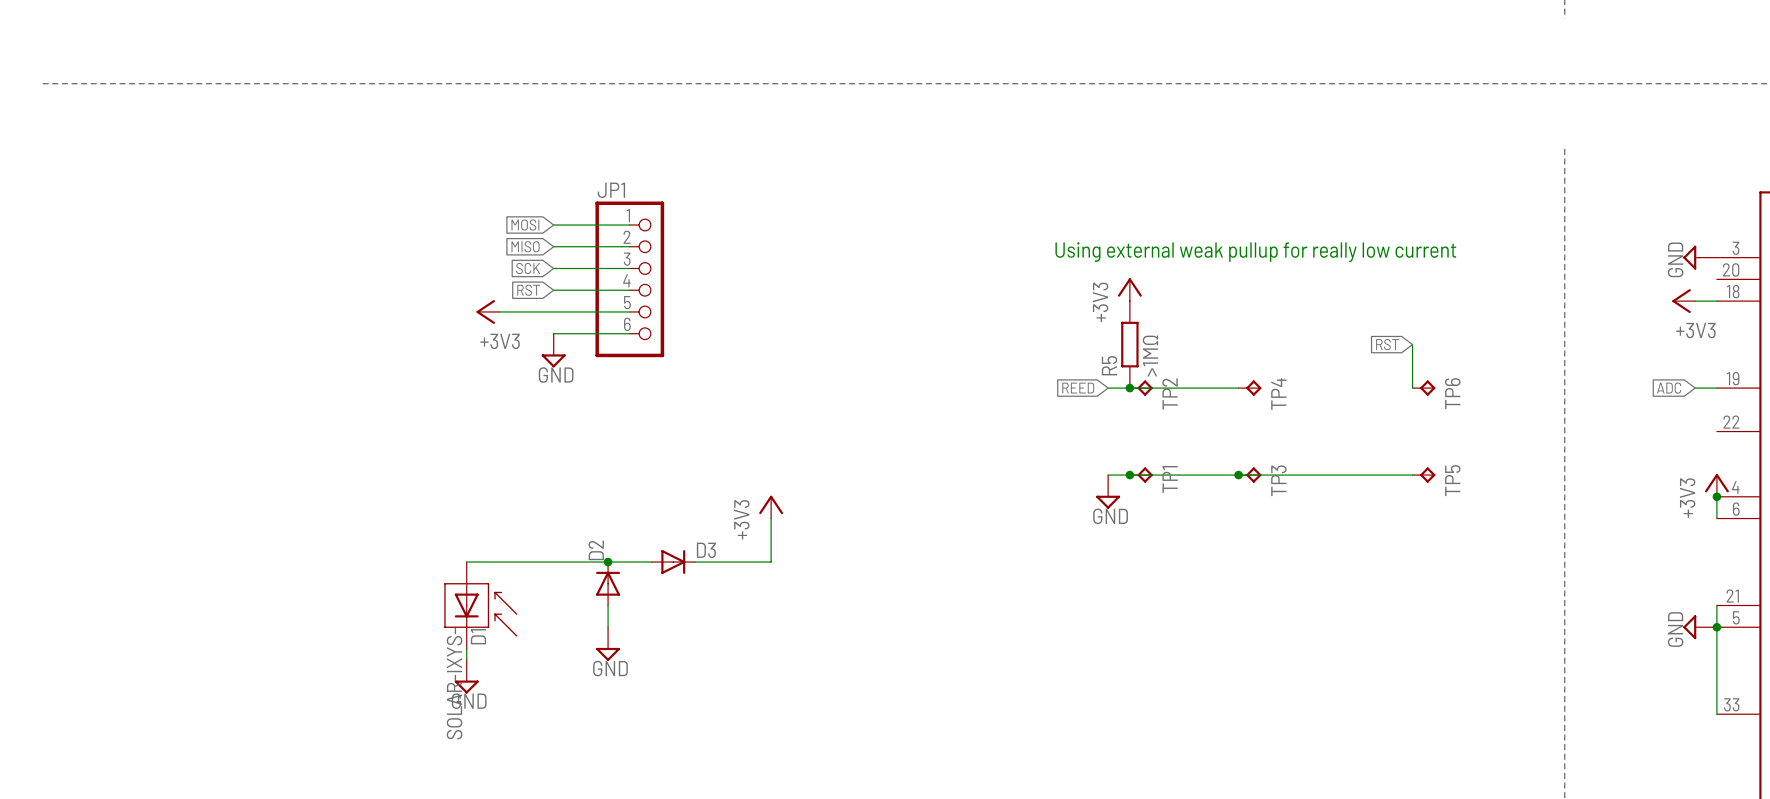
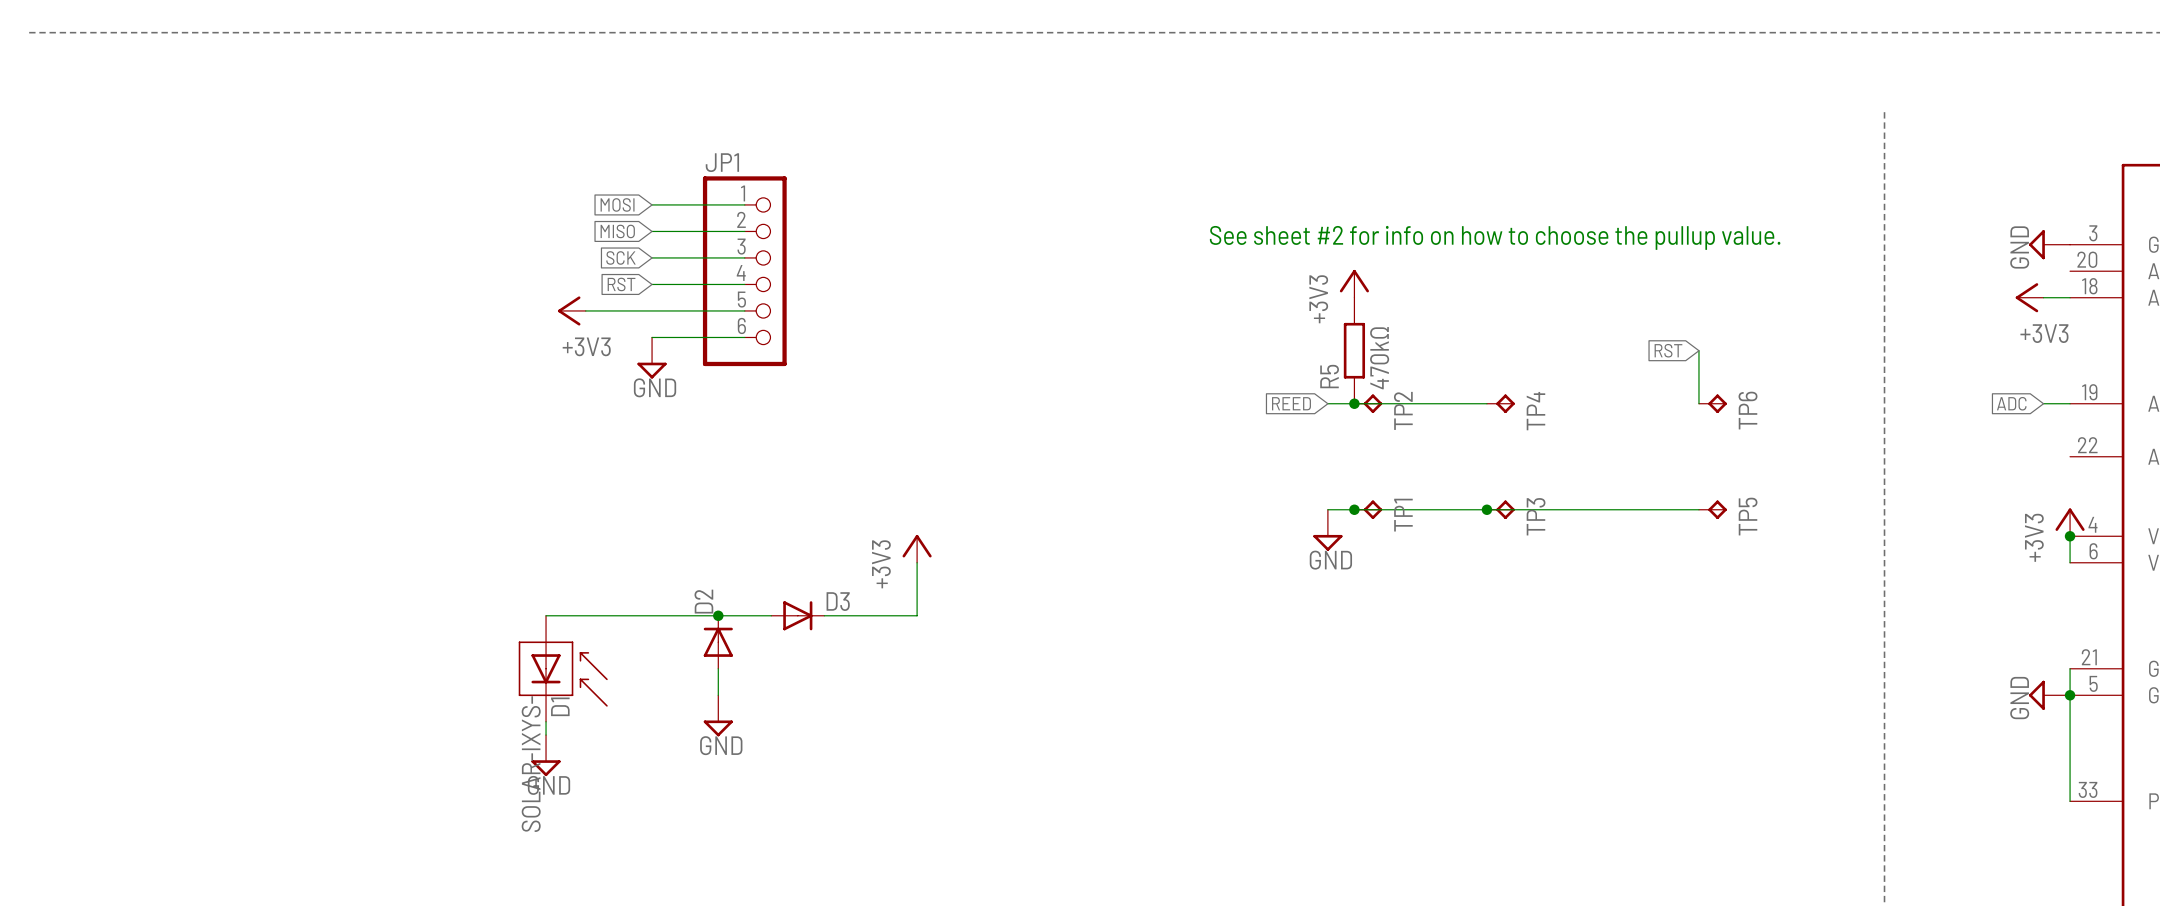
text: none -> See sheet #2 for info on how to choose the pullup value. (1495, 237)
text: Using external weak pullup for really low current (1255, 252) -> none
R5 value: >1MΩ (1150, 355) -> 470kΩ (1379, 358)

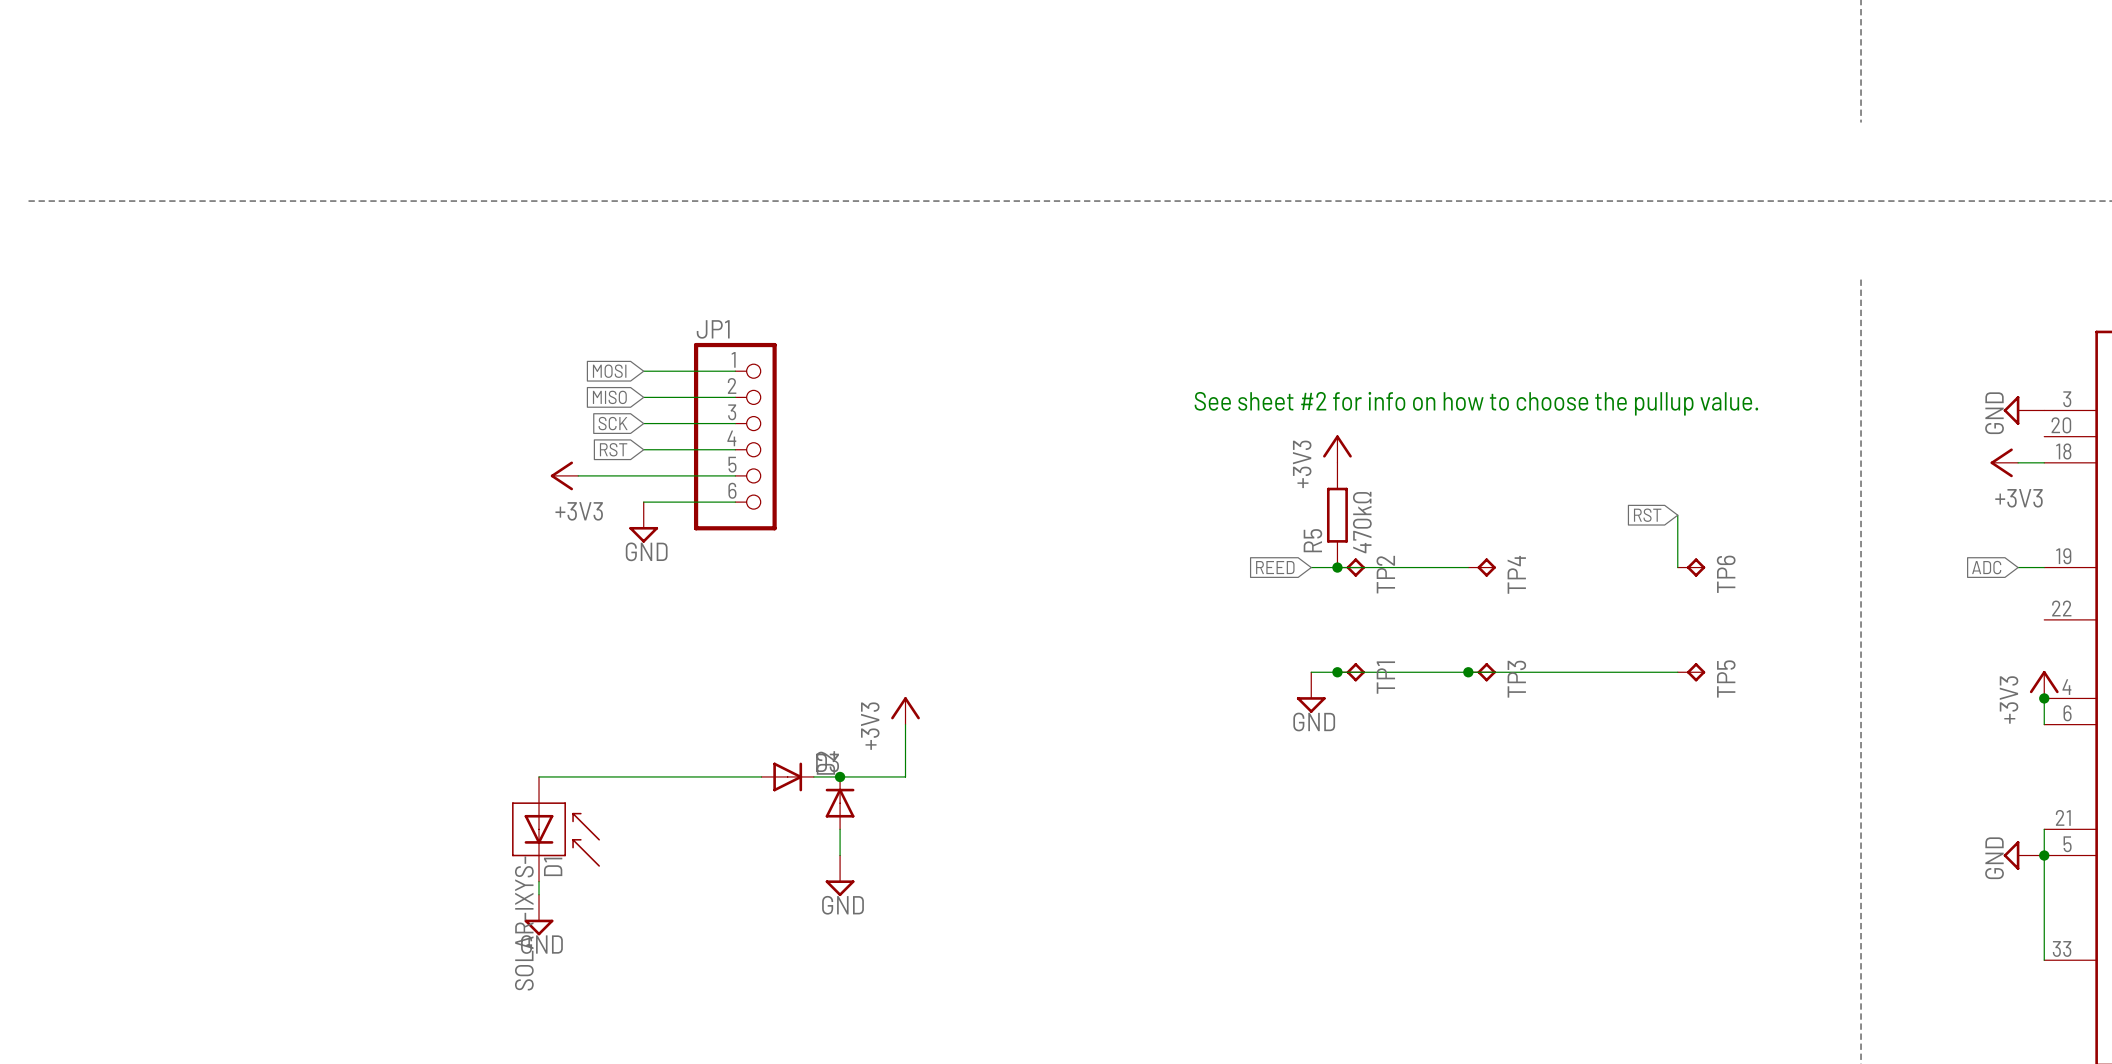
junction: (718, 615) -> none
junction: none -> (840, 776)
D2 position: (718, 642) -> (840, 803)
wire: (718, 668) (718, 695) -> (840, 829) (840, 855)
power symbol position: GND (718, 715) -> GND (840, 875)

